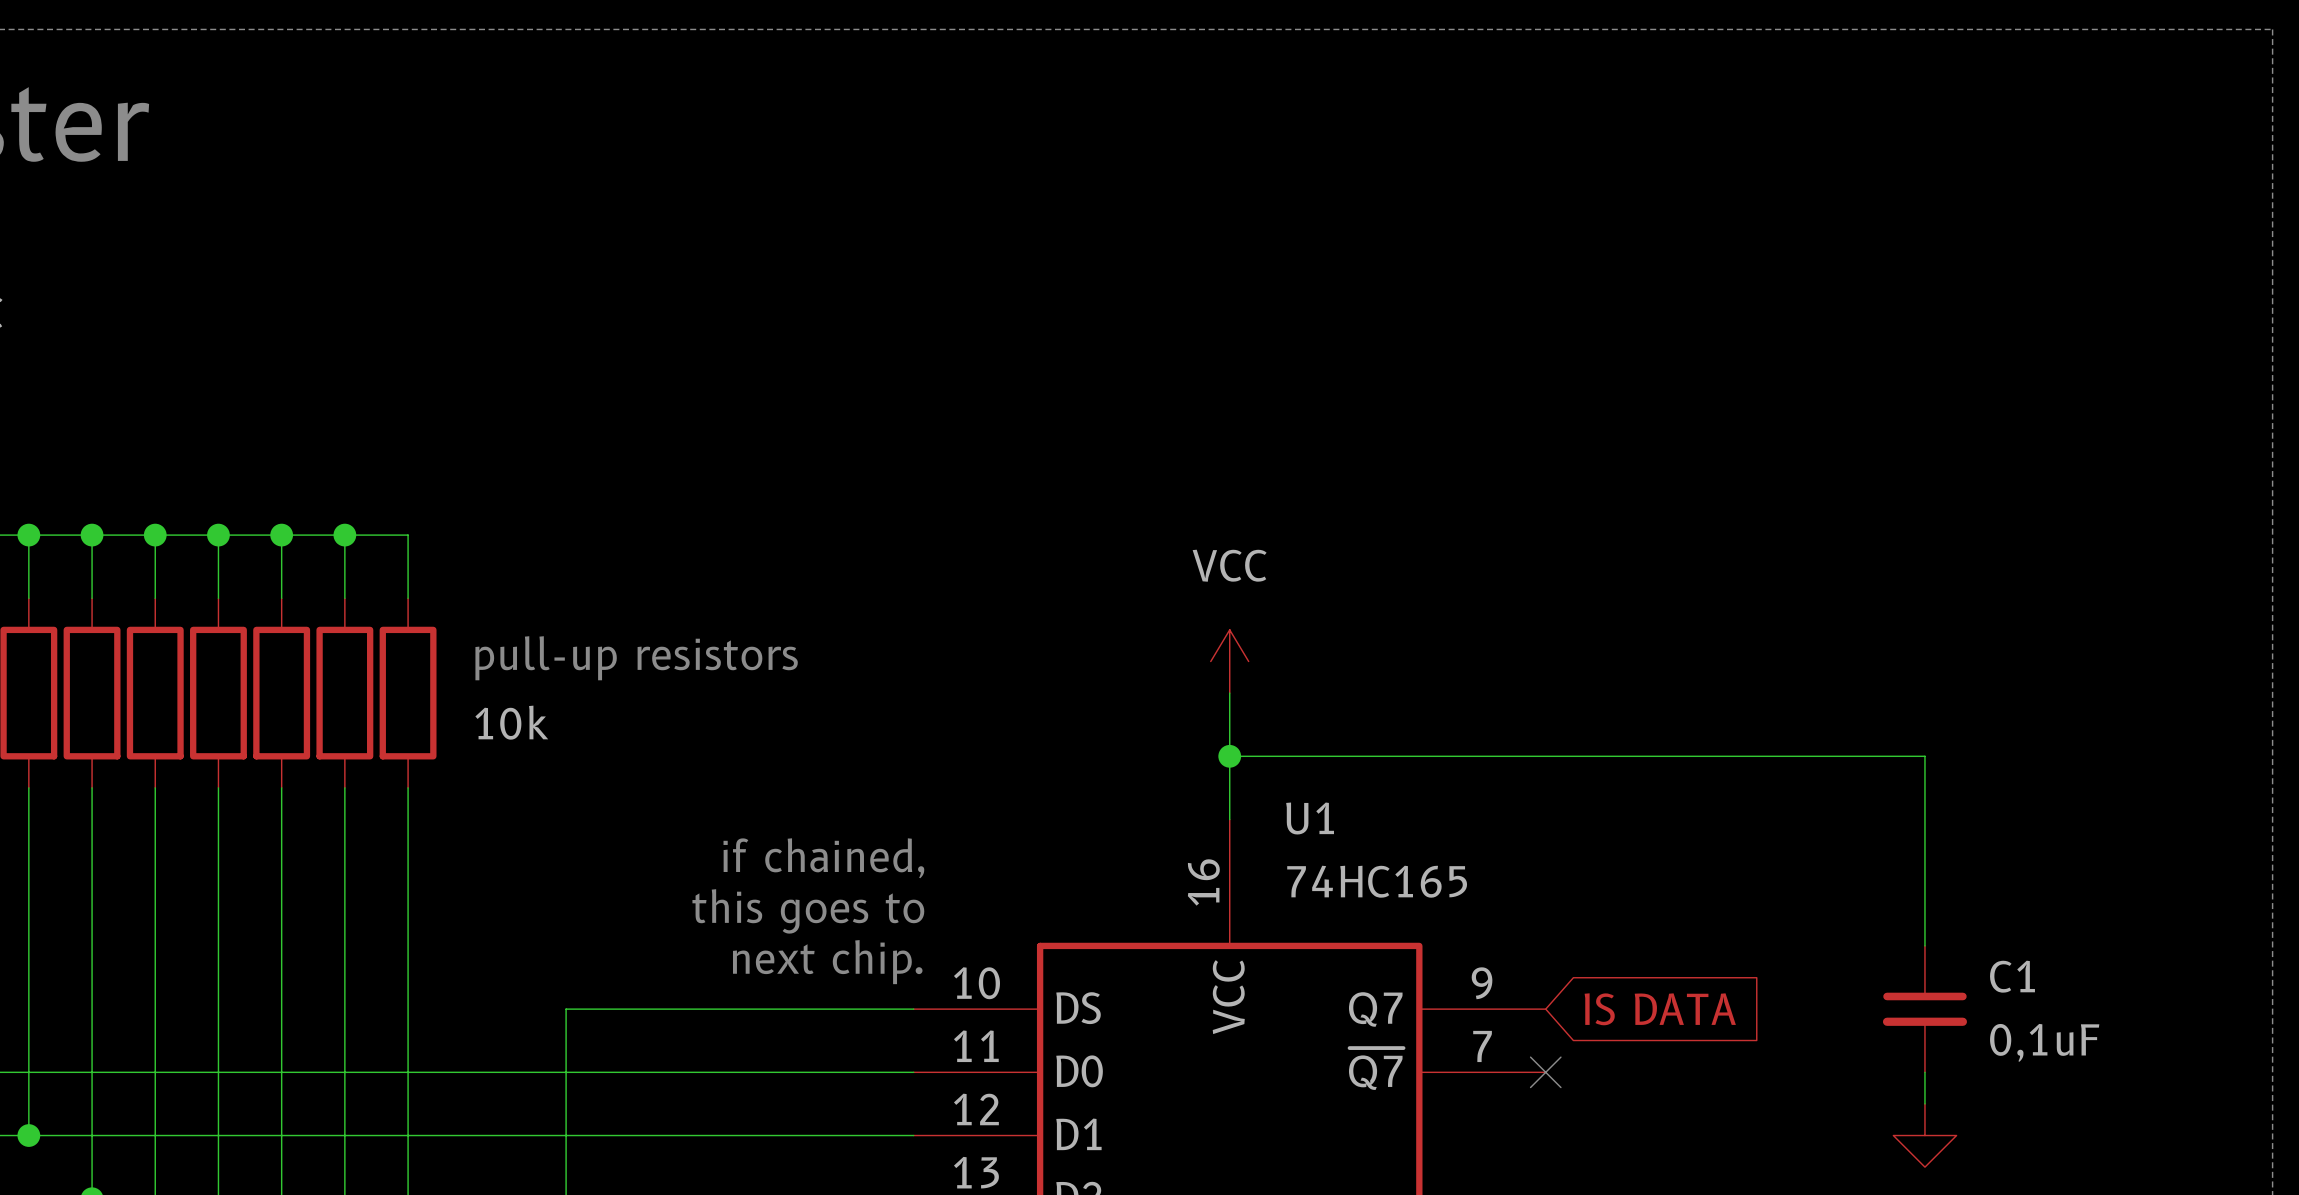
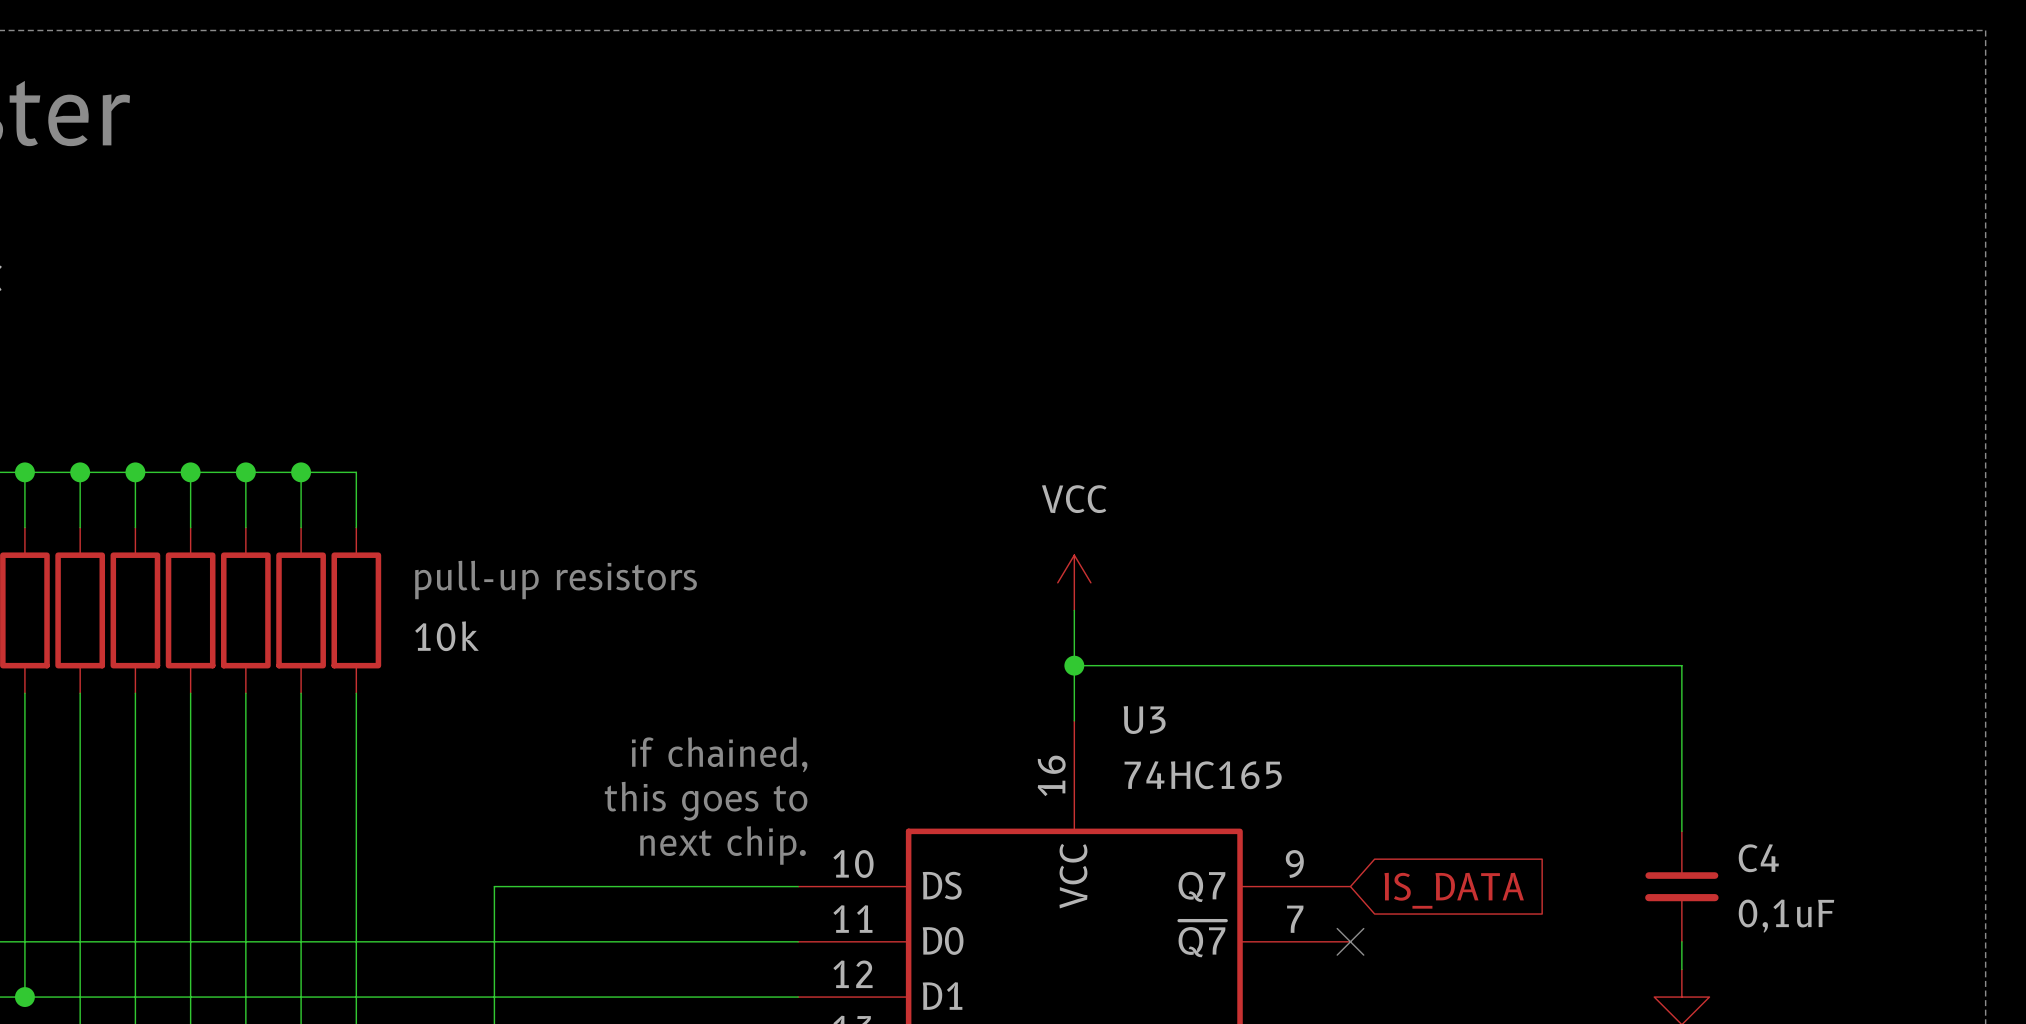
U1 name: U1 (1310, 818) -> U3 (1144, 720)
C1 name: C1 (2012, 976) -> C4 (1758, 858)
global label: IS DATA (1660, 1009) -> IS_DATA (1454, 890)

